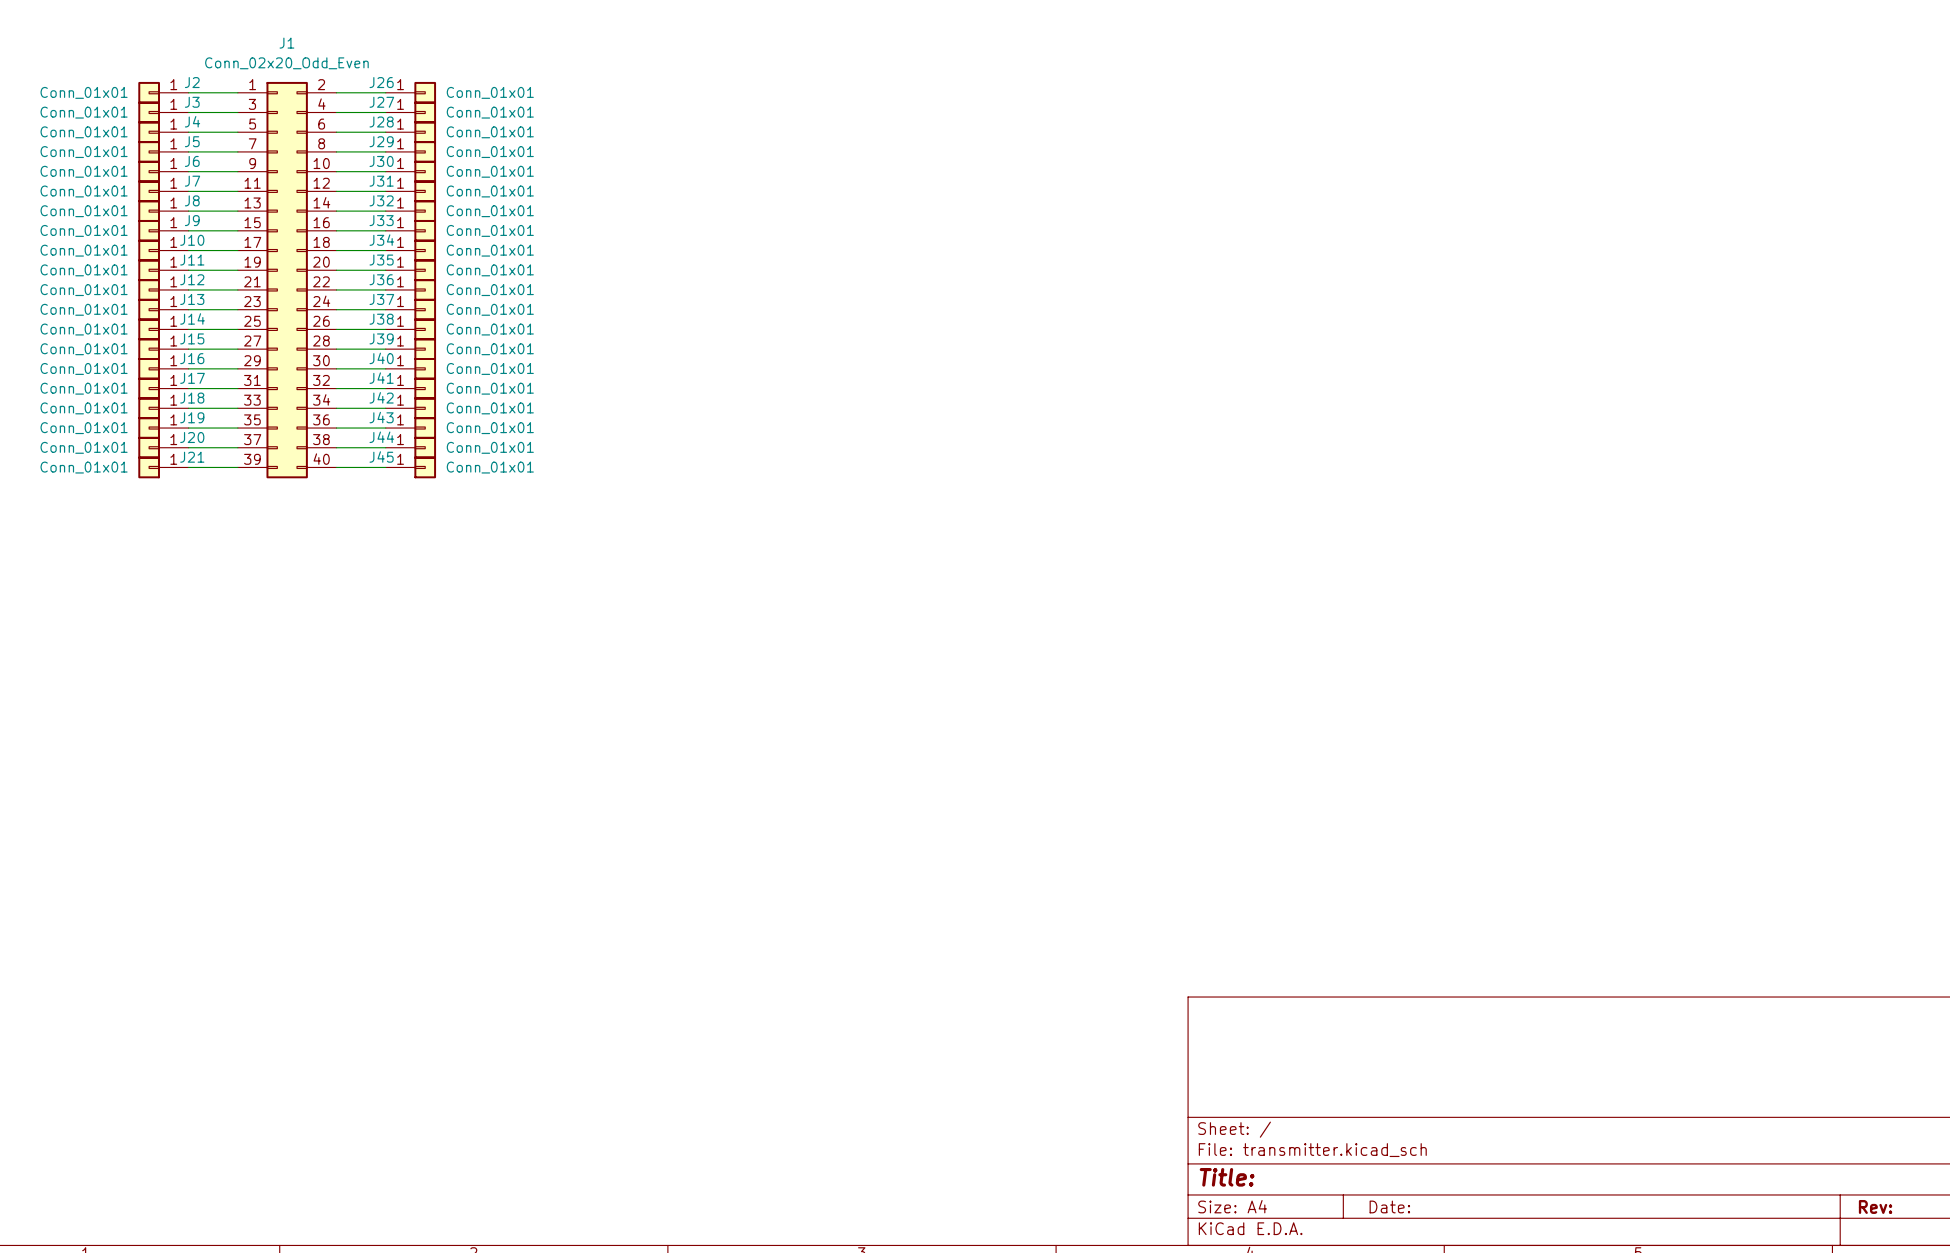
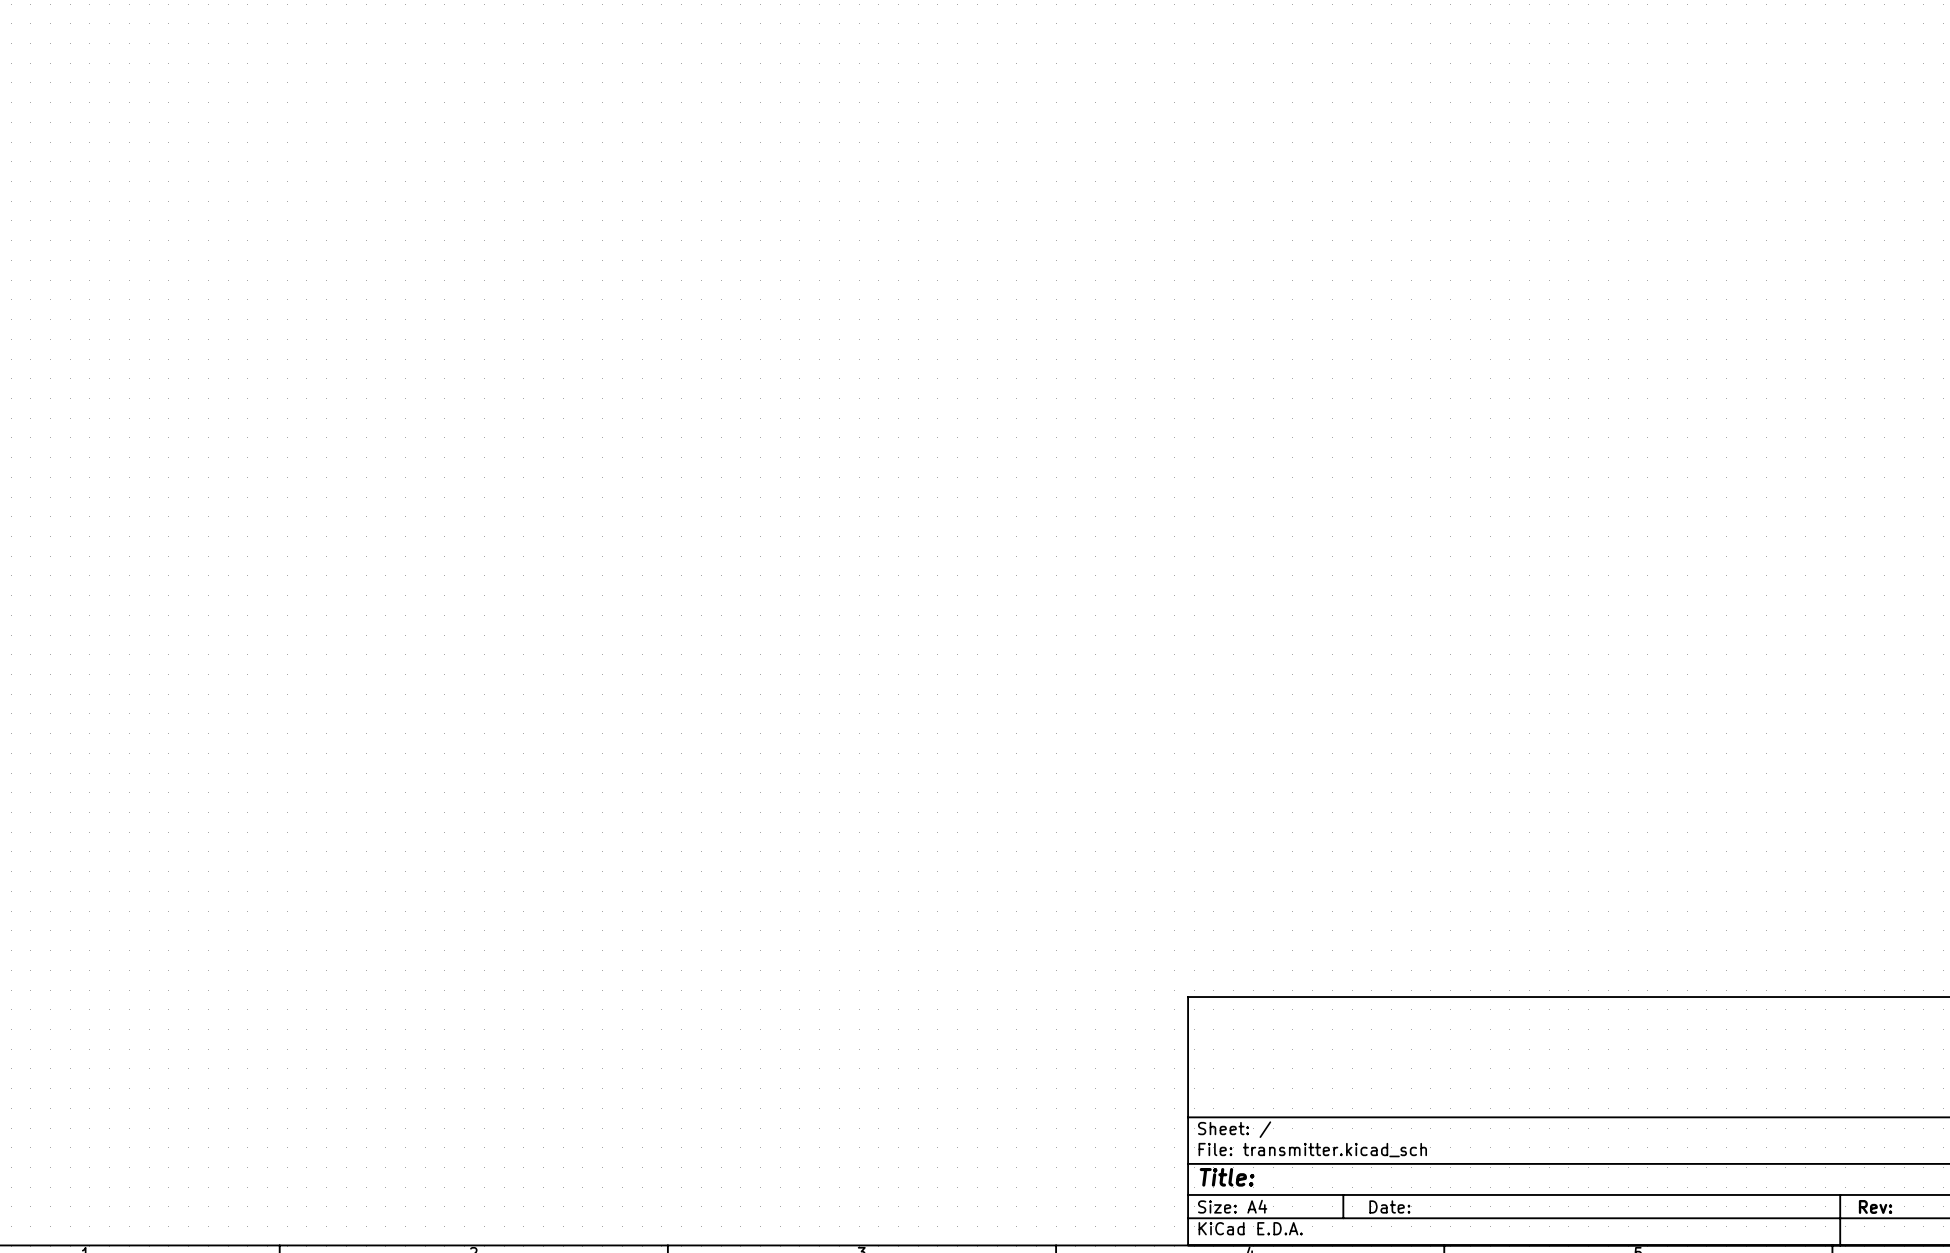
J2: Conn_01x01 (163, 92) -> none
wire: (188, 92) (237, 92) -> none
wire: (336, 92) (385, 92) -> none
J26: Conn_01x01 (410, 92) -> none
J3: Conn_01x01 (163, 112) -> none
wire: (188, 112) (237, 112) -> none
wire: (336, 112) (385, 112) -> none
J27: Conn_01x01 (410, 112) -> none
J4: Conn_01x01 (163, 132) -> none
wire: (188, 132) (237, 132) -> none
wire: (336, 132) (385, 132) -> none
J28: Conn_01x01 (410, 132) -> none
J5: Conn_01x01 (163, 151) -> none
wire: (188, 151) (237, 151) -> none
wire: (336, 151) (385, 151) -> none
J29: Conn_01x01 (410, 151) -> none
J6: Conn_01x01 (163, 171) -> none
wire: (188, 171) (237, 171) -> none
wire: (336, 171) (385, 171) -> none
J30: Conn_01x01 (410, 171) -> none
J7: Conn_01x01 (163, 191) -> none
wire: (188, 191) (237, 191) -> none
wire: (336, 191) (385, 191) -> none
J31: Conn_01x01 (410, 191) -> none
J8: Conn_01x01 (163, 211) -> none
wire: (188, 211) (237, 211) -> none
wire: (336, 211) (385, 211) -> none
J32: Conn_01x01 (410, 211) -> none
J9: Conn_01x01 (163, 230) -> none
wire: (188, 230) (237, 230) -> none
wire: (336, 230) (385, 230) -> none
J33: Conn_01x01 (410, 230) -> none
J10: Conn_01x01 (163, 250) -> none
wire: (188, 250) (237, 250) -> none
wire: (336, 250) (385, 250) -> none
J34: Conn_01x01 (410, 250) -> none
J11: Conn_01x01 (163, 270) -> none
wire: (188, 270) (237, 270) -> none
wire: (336, 270) (385, 270) -> none
J35: Conn_01x01 (410, 270) -> none
J1: Conn_02x20_Odd_Even (287, 280) -> none
J12: Conn_01x01 (163, 289) -> none
wire: (188, 289) (237, 289) -> none
wire: (336, 289) (385, 289) -> none
J36: Conn_01x01 (410, 289) -> none
J13: Conn_01x01 (163, 309) -> none
wire: (188, 309) (237, 309) -> none
wire: (336, 309) (385, 309) -> none
J37: Conn_01x01 (410, 309) -> none
J14: Conn_01x01 (163, 329) -> none
wire: (188, 329) (237, 329) -> none
wire: (336, 329) (385, 329) -> none
J38: Conn_01x01 (410, 329) -> none
J15: Conn_01x01 (163, 349) -> none
wire: (188, 349) (237, 349) -> none
wire: (336, 349) (385, 349) -> none
J39: Conn_01x01 (410, 349) -> none
J16: Conn_01x01 (163, 368) -> none
wire: (188, 368) (237, 368) -> none
wire: (336, 368) (385, 368) -> none
J40: Conn_01x01 (410, 368) -> none
J17: Conn_01x01 (163, 388) -> none
wire: (188, 388) (237, 388) -> none
wire: (336, 388) (385, 388) -> none
J41: Conn_01x01 (410, 388) -> none
J18: Conn_01x01 (163, 408) -> none
wire: (188, 408) (237, 408) -> none
wire: (336, 408) (385, 408) -> none
J42: Conn_01x01 (410, 408) -> none
J19: Conn_01x01 (163, 428) -> none
wire: (188, 428) (237, 428) -> none
wire: (336, 428) (385, 428) -> none
J43: Conn_01x01 (410, 428) -> none
J20: Conn_01x01 (163, 447) -> none
wire: (188, 447) (237, 447) -> none
wire: (336, 447) (385, 447) -> none
J44: Conn_01x01 (410, 447) -> none
J21: Conn_01x01 (163, 467) -> none
wire: (188, 467) (237, 467) -> none
wire: (336, 467) (385, 467) -> none
J45: Conn_01x01 (410, 467) -> none

